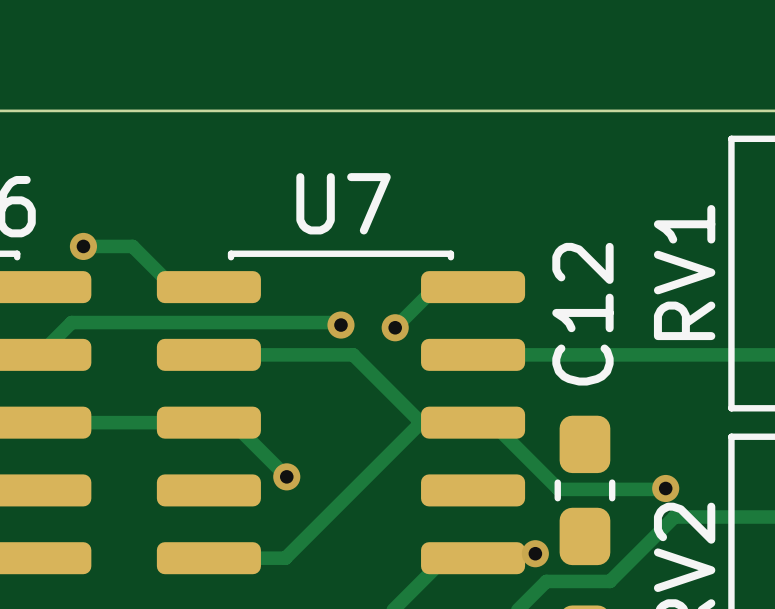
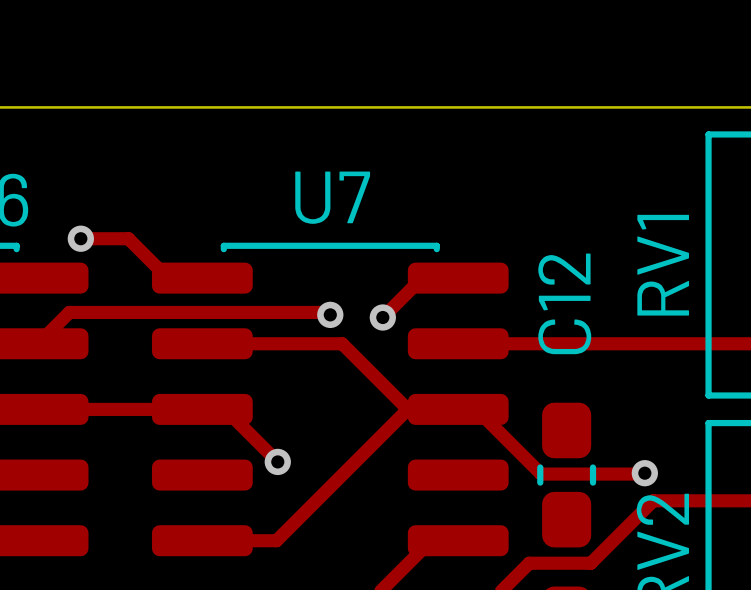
via: (535, 553) -> none

